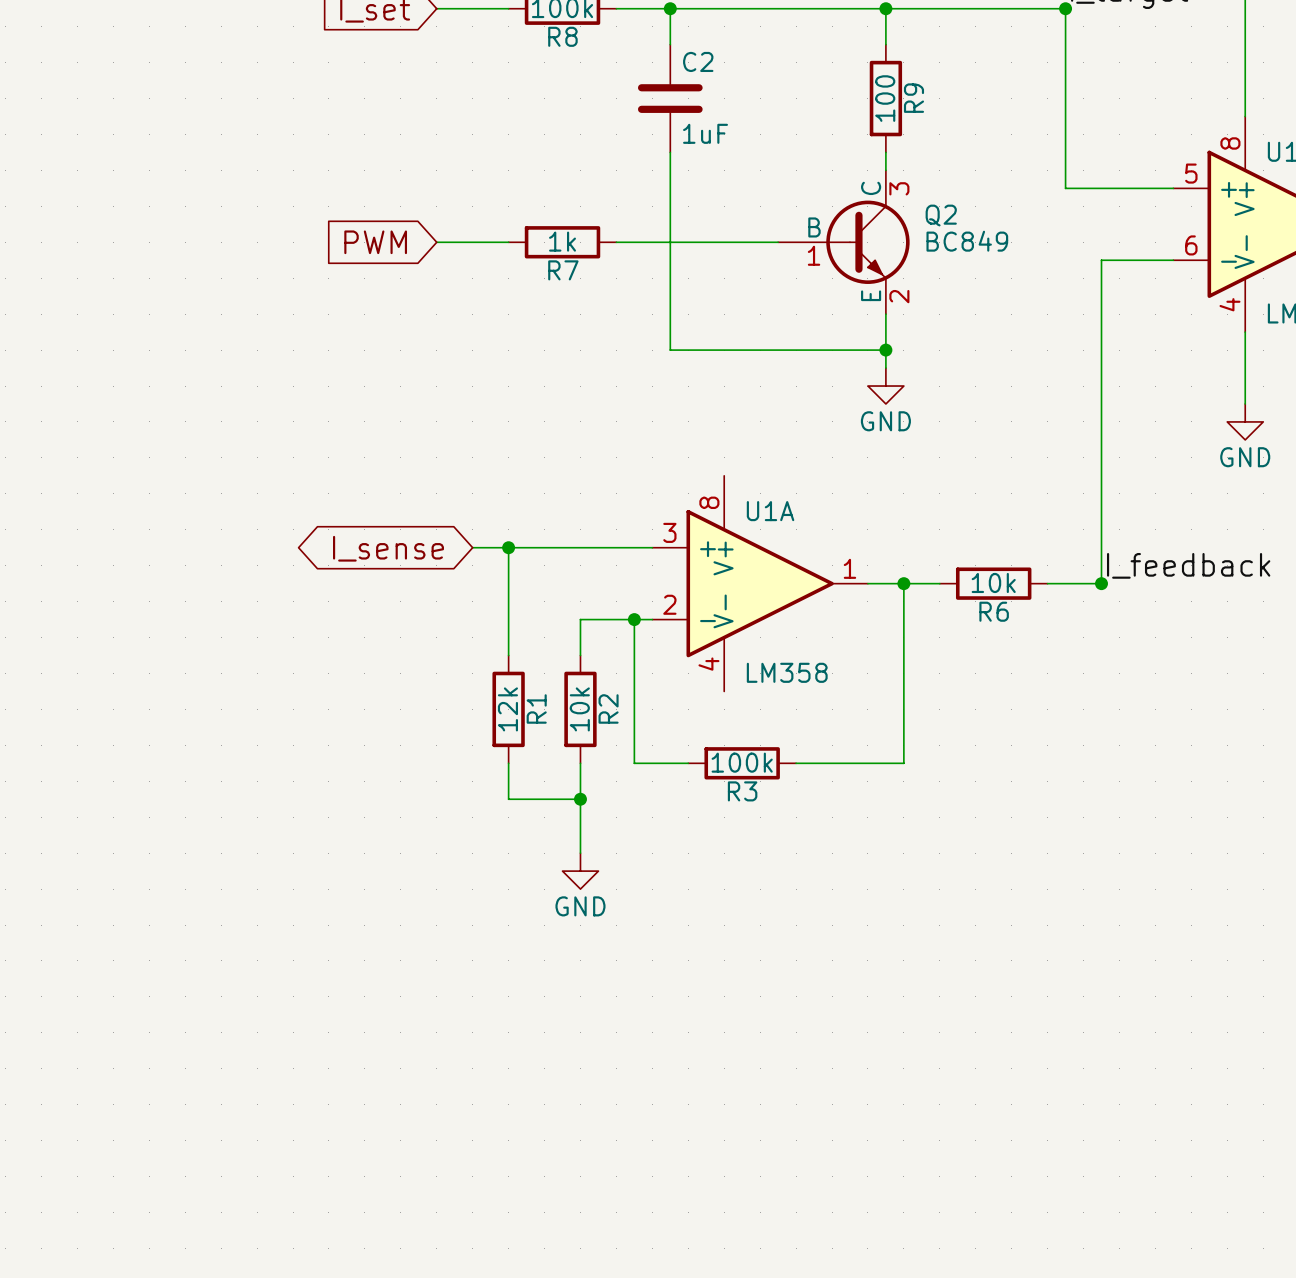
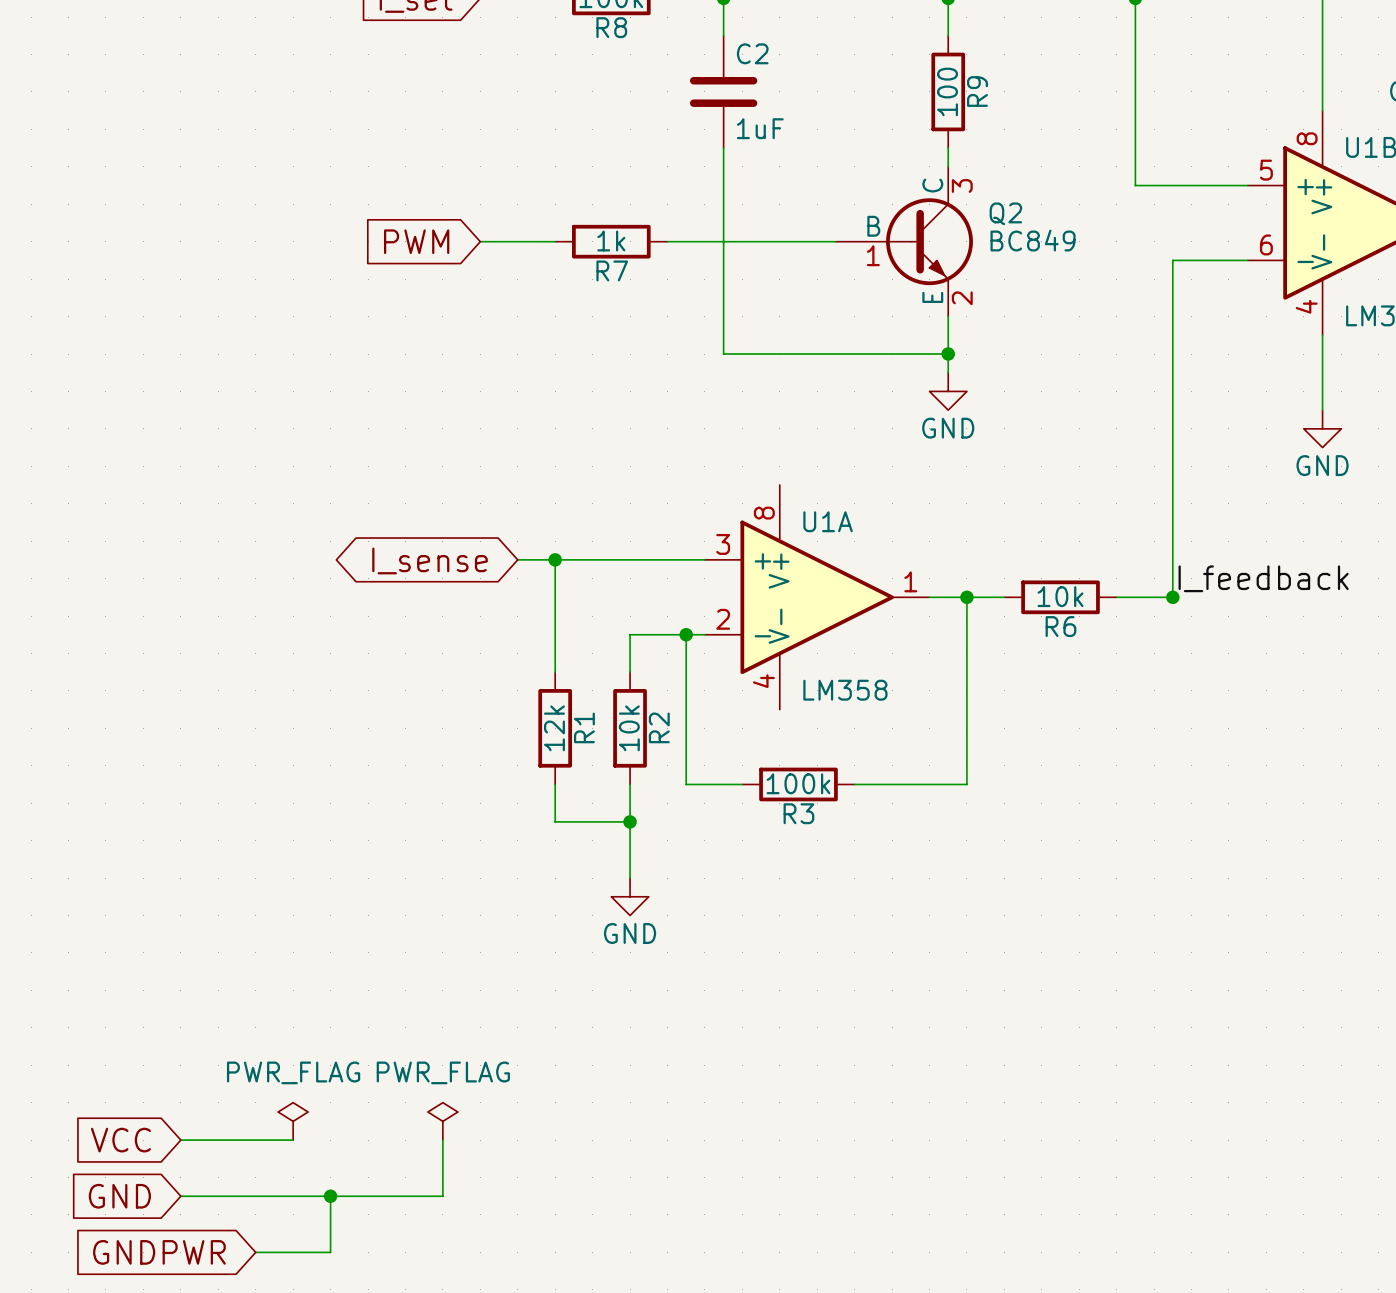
power symbol: none -> PWR_FLAG (293, 1121)
power symbol: none -> PWR_FLAG (442, 1121)
global label: none -> VCC (120, 1140)
wire: none -> (180, 1140) (293, 1140)
wire: none -> (442, 1140) (442, 1196) (180, 1196)
global label: none -> GND (119, 1196)
wire: none -> (330, 1196) (330, 1252) (255, 1252)
junction: none -> (330, 1196)
global label: none -> GNDPWR (159, 1252)

